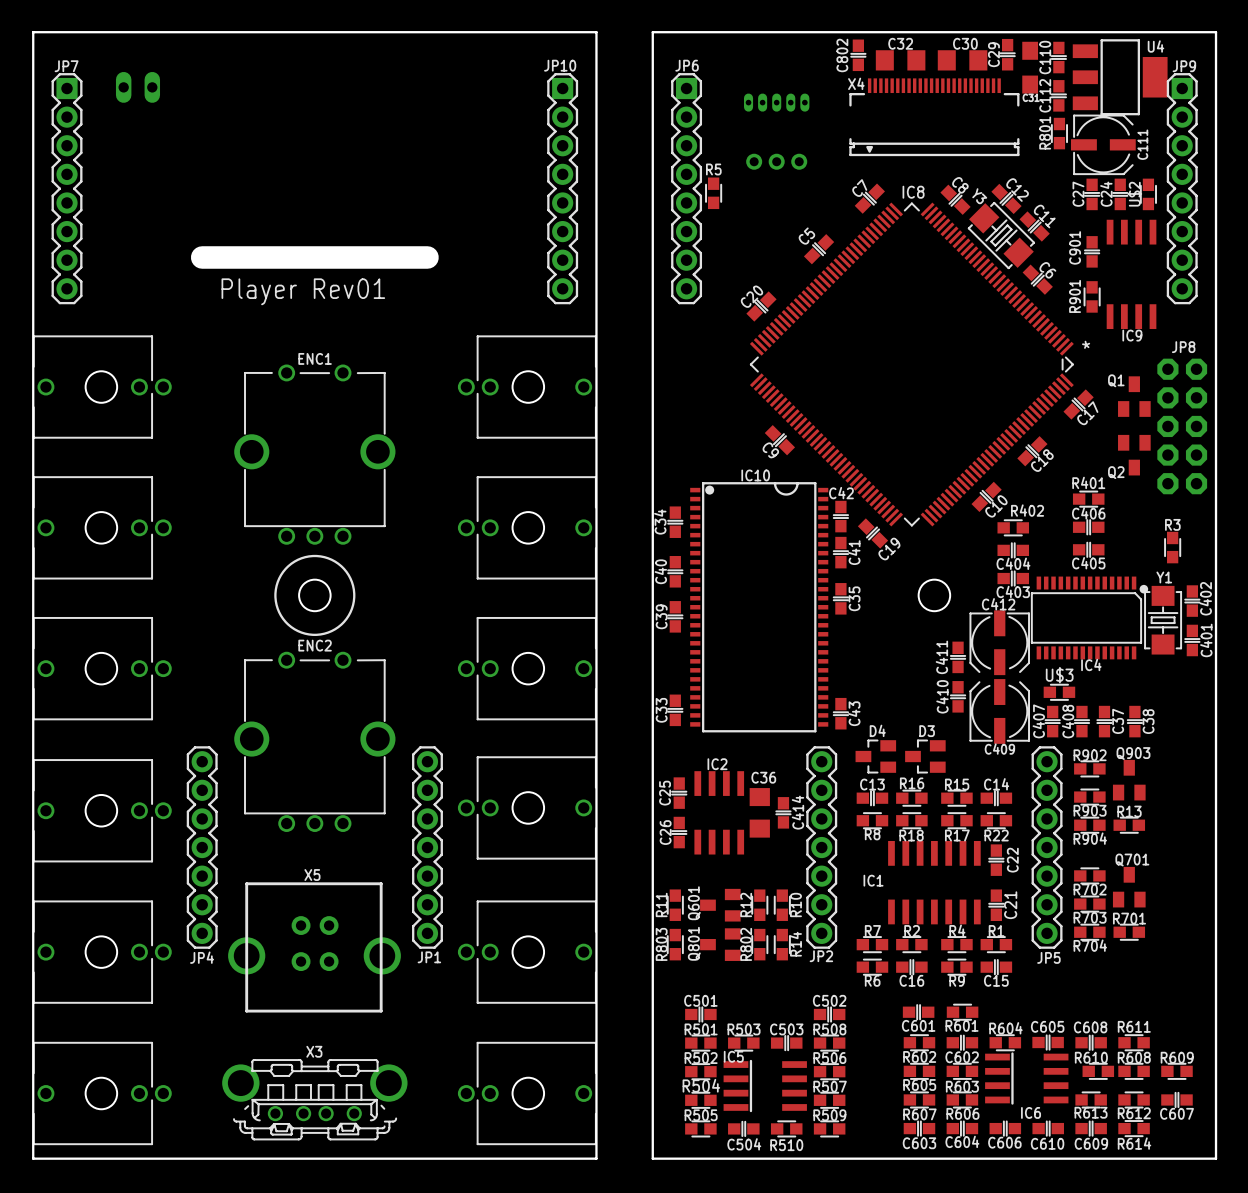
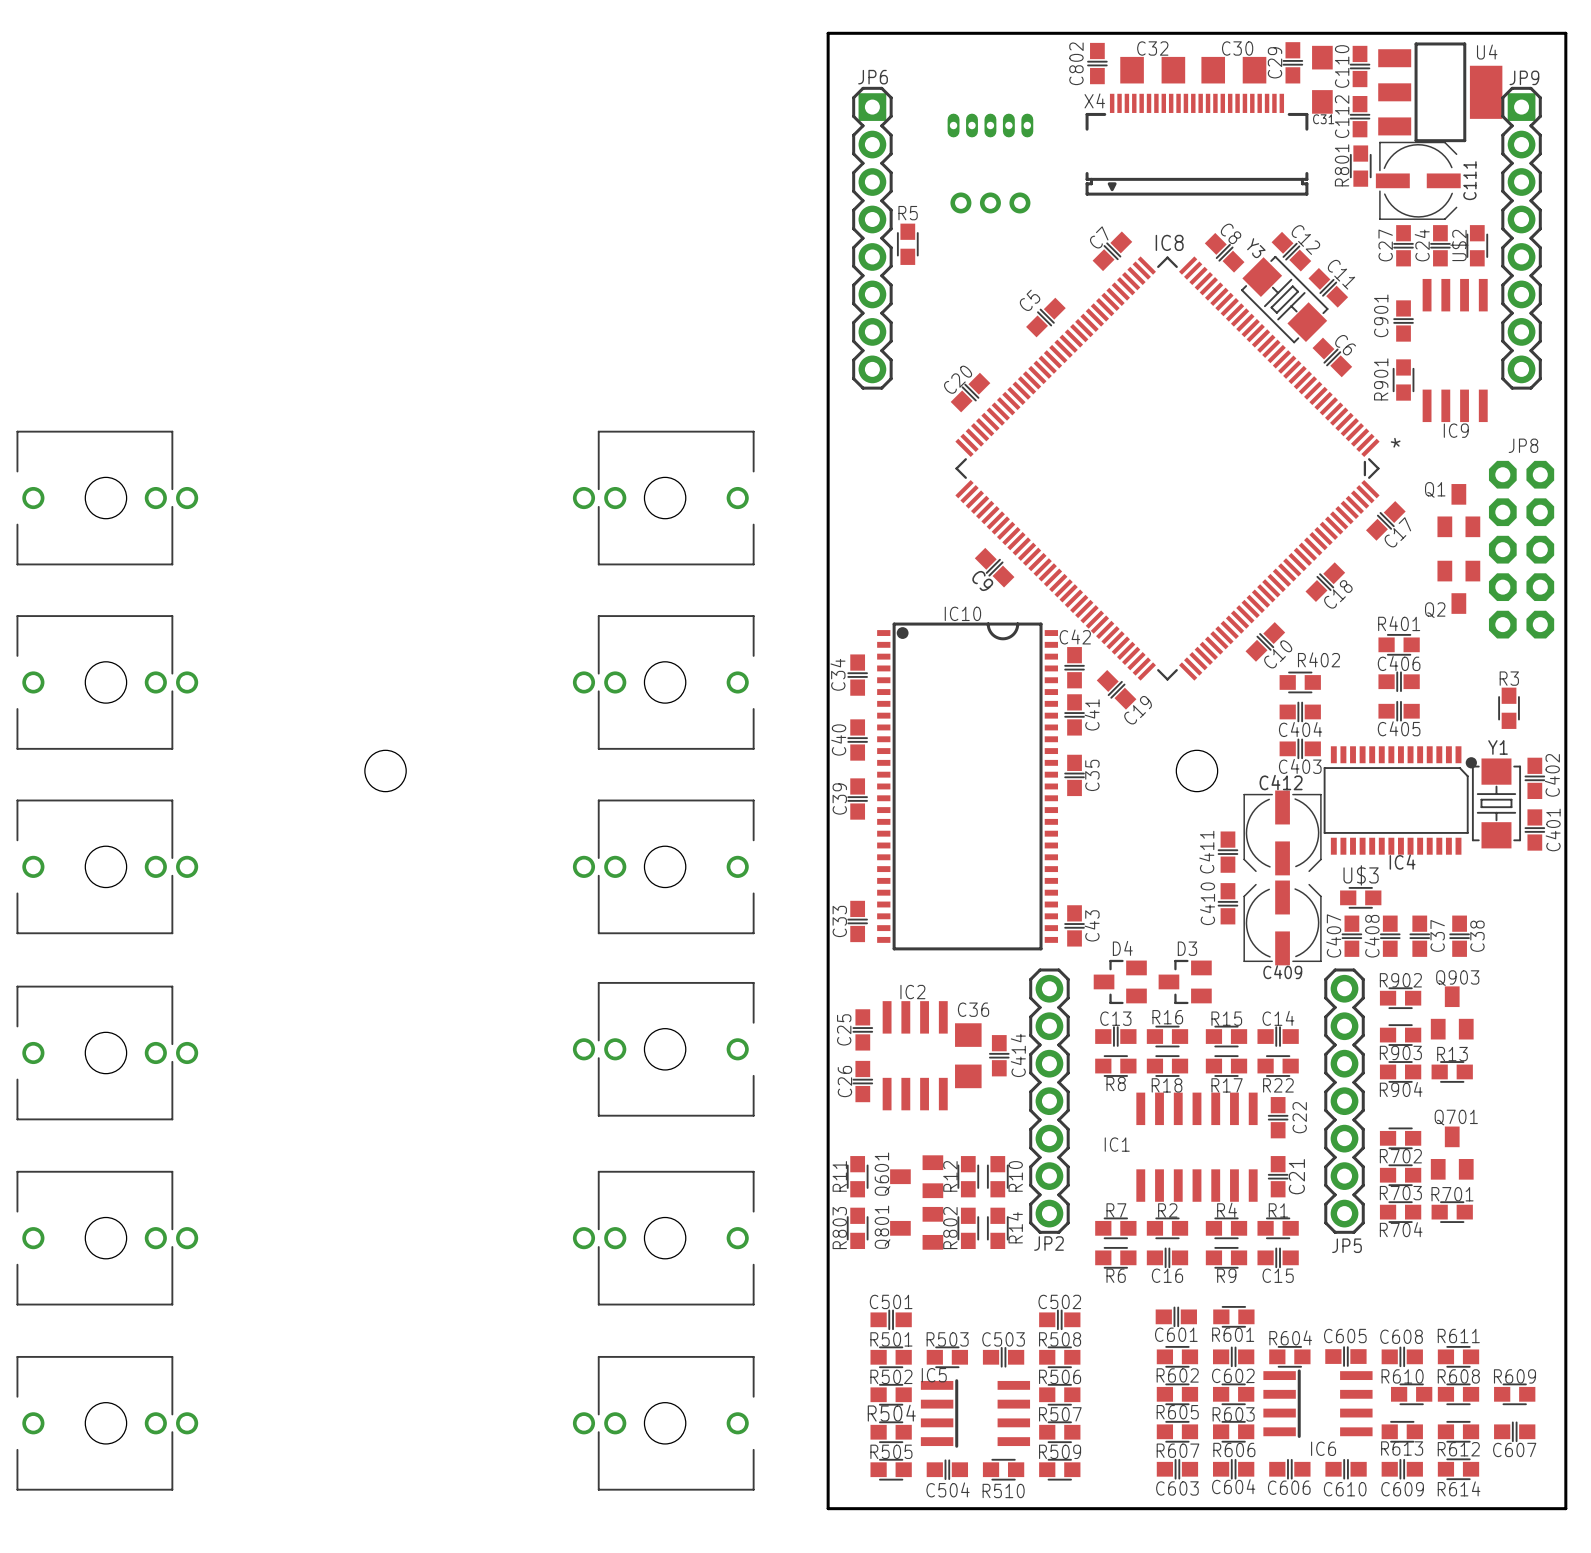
board edge: (33, 32) (596, 32) (596, 1158) (33, 1158) (33, 32) -> none
part: (137, 87) -> none
JP7: (67, 188) -> none
JP10: (562, 188) -> none
board edge: (202, 257) (427, 257) -> none
text: Player Rev01 (303, 291) -> none
ENC1: (314, 454) -> none
drawing: [274, 554, 356, 637] -> none
ENC2: (314, 741) -> none
JP4: (202, 847) -> none
JP1: (427, 847) -> none
X5: (314, 947) -> none
X3: (314, 1099) -> none

